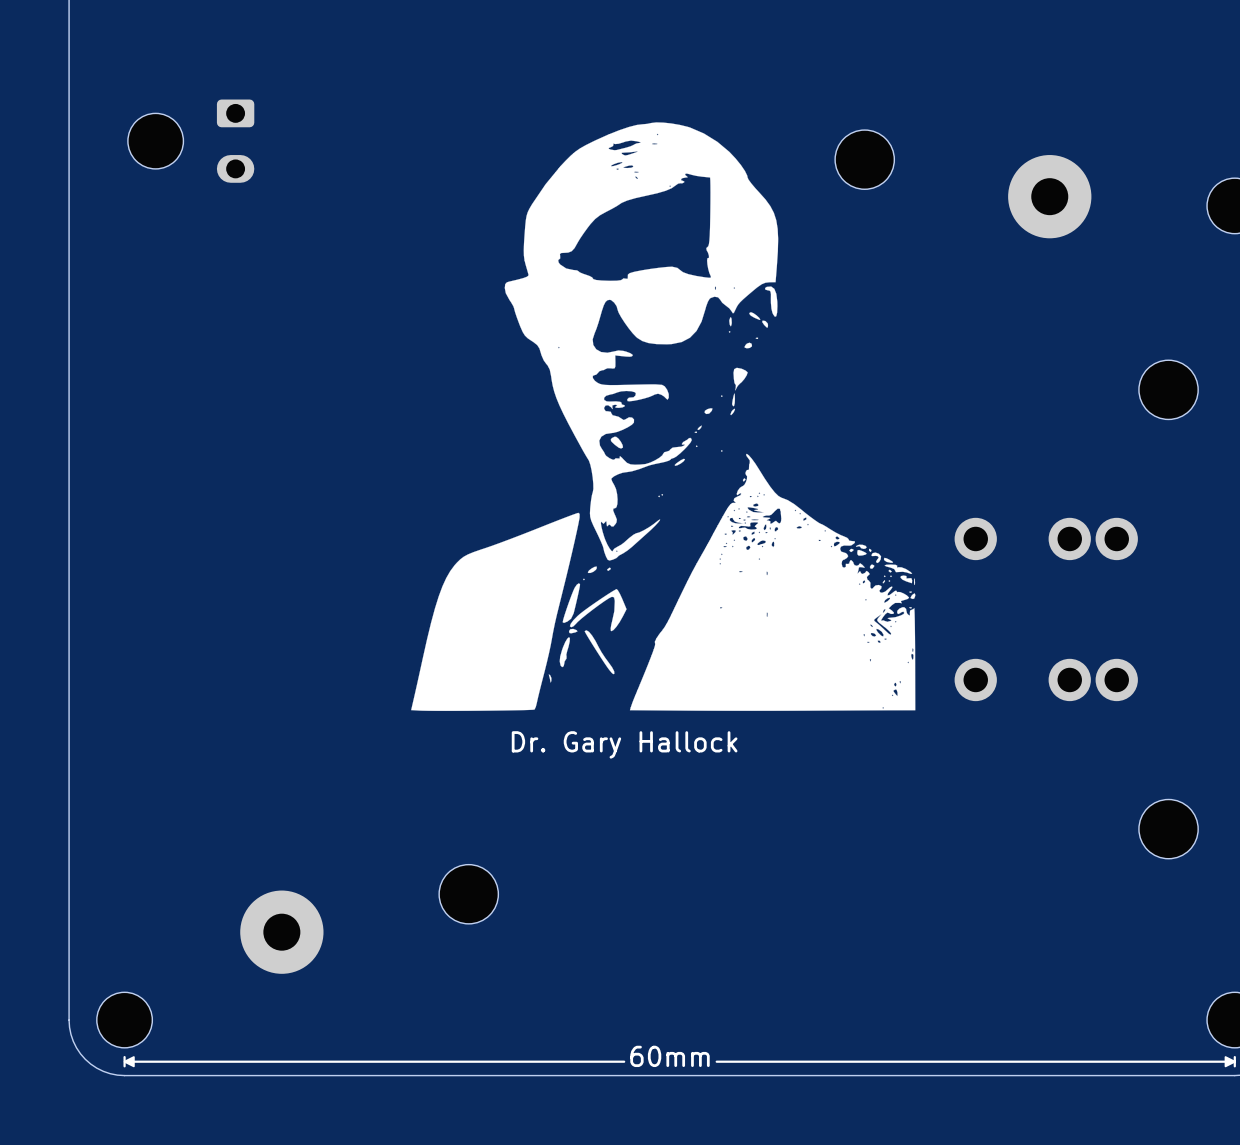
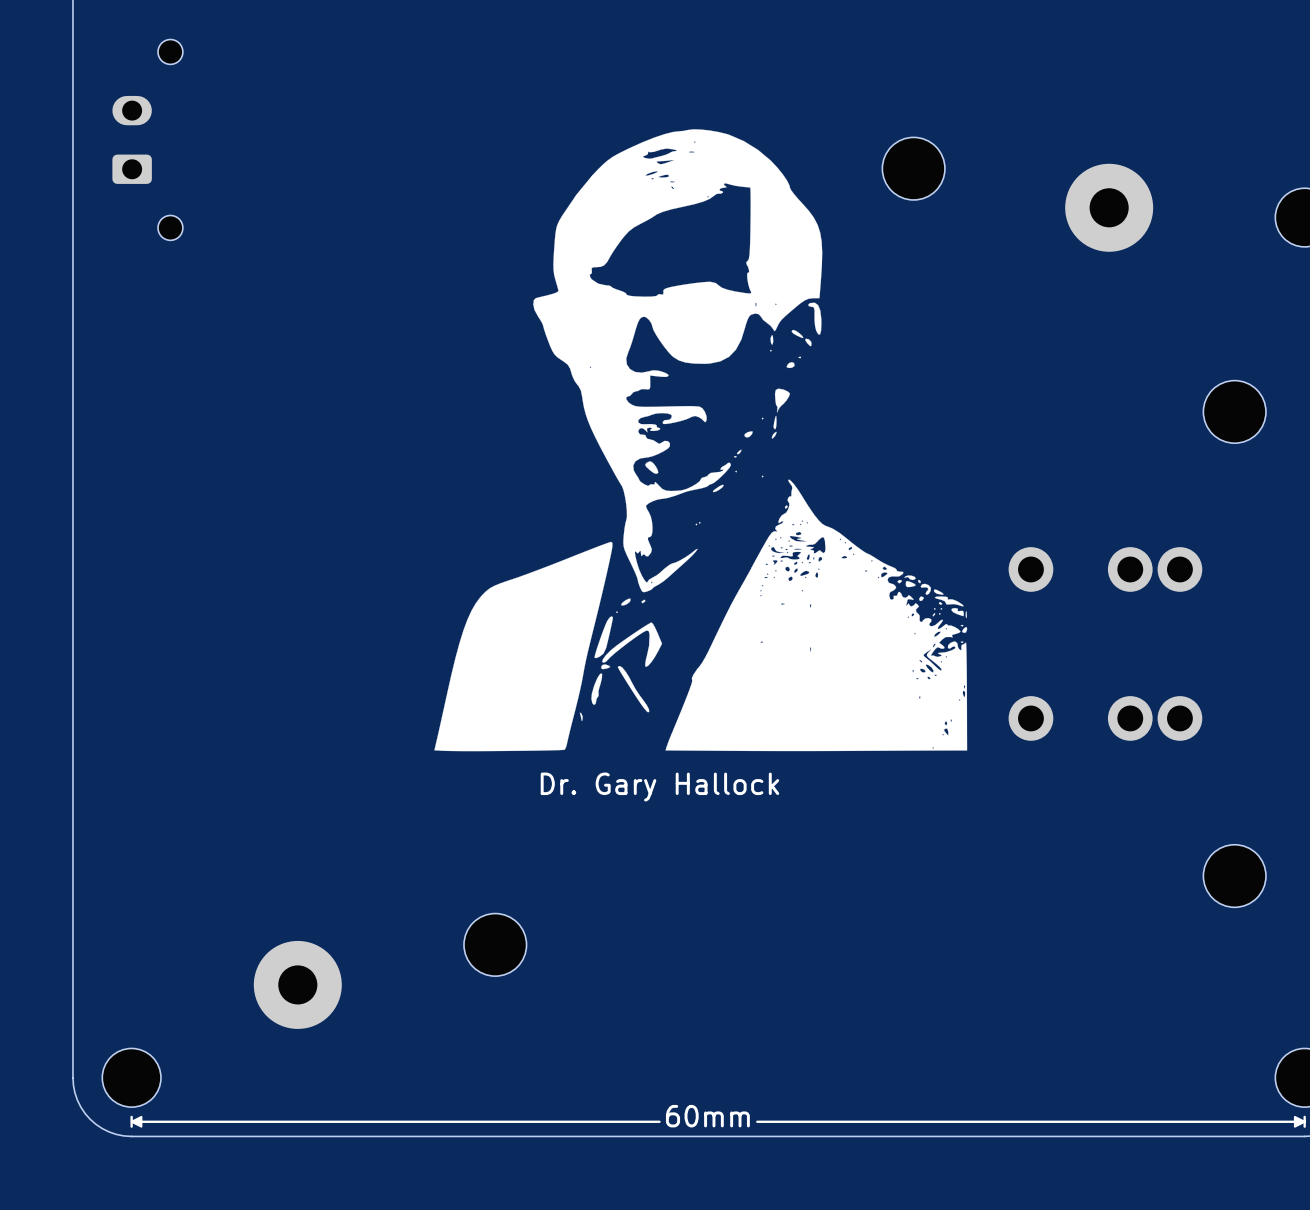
part: none -> (147, 139)
part: (191, 141) -> none

